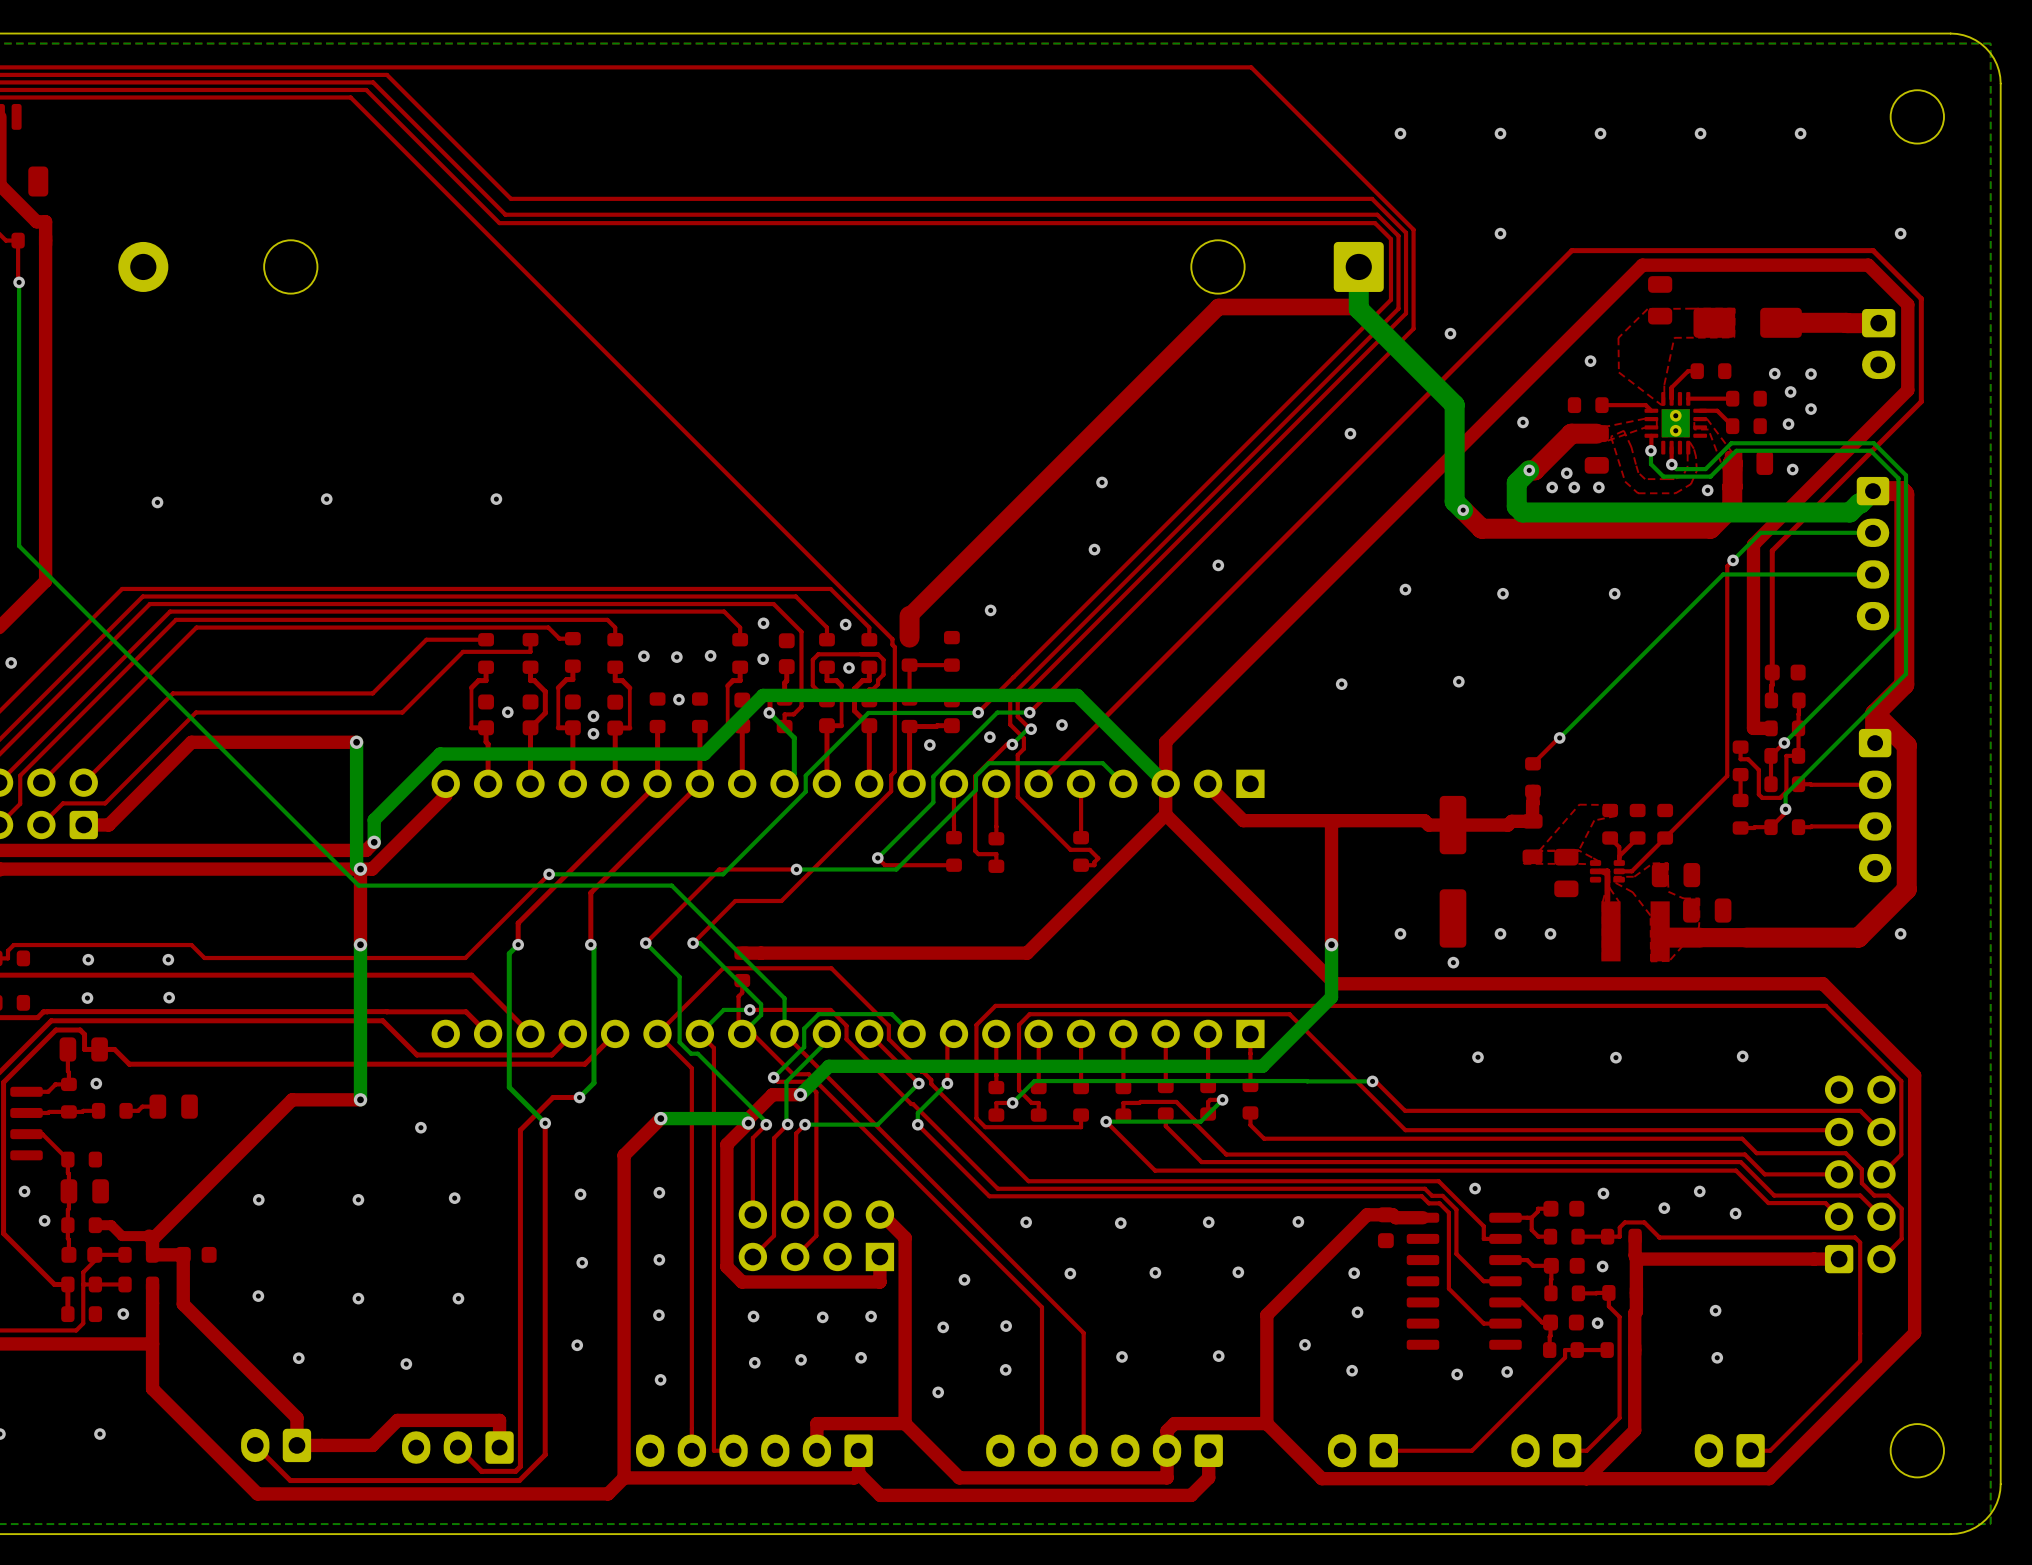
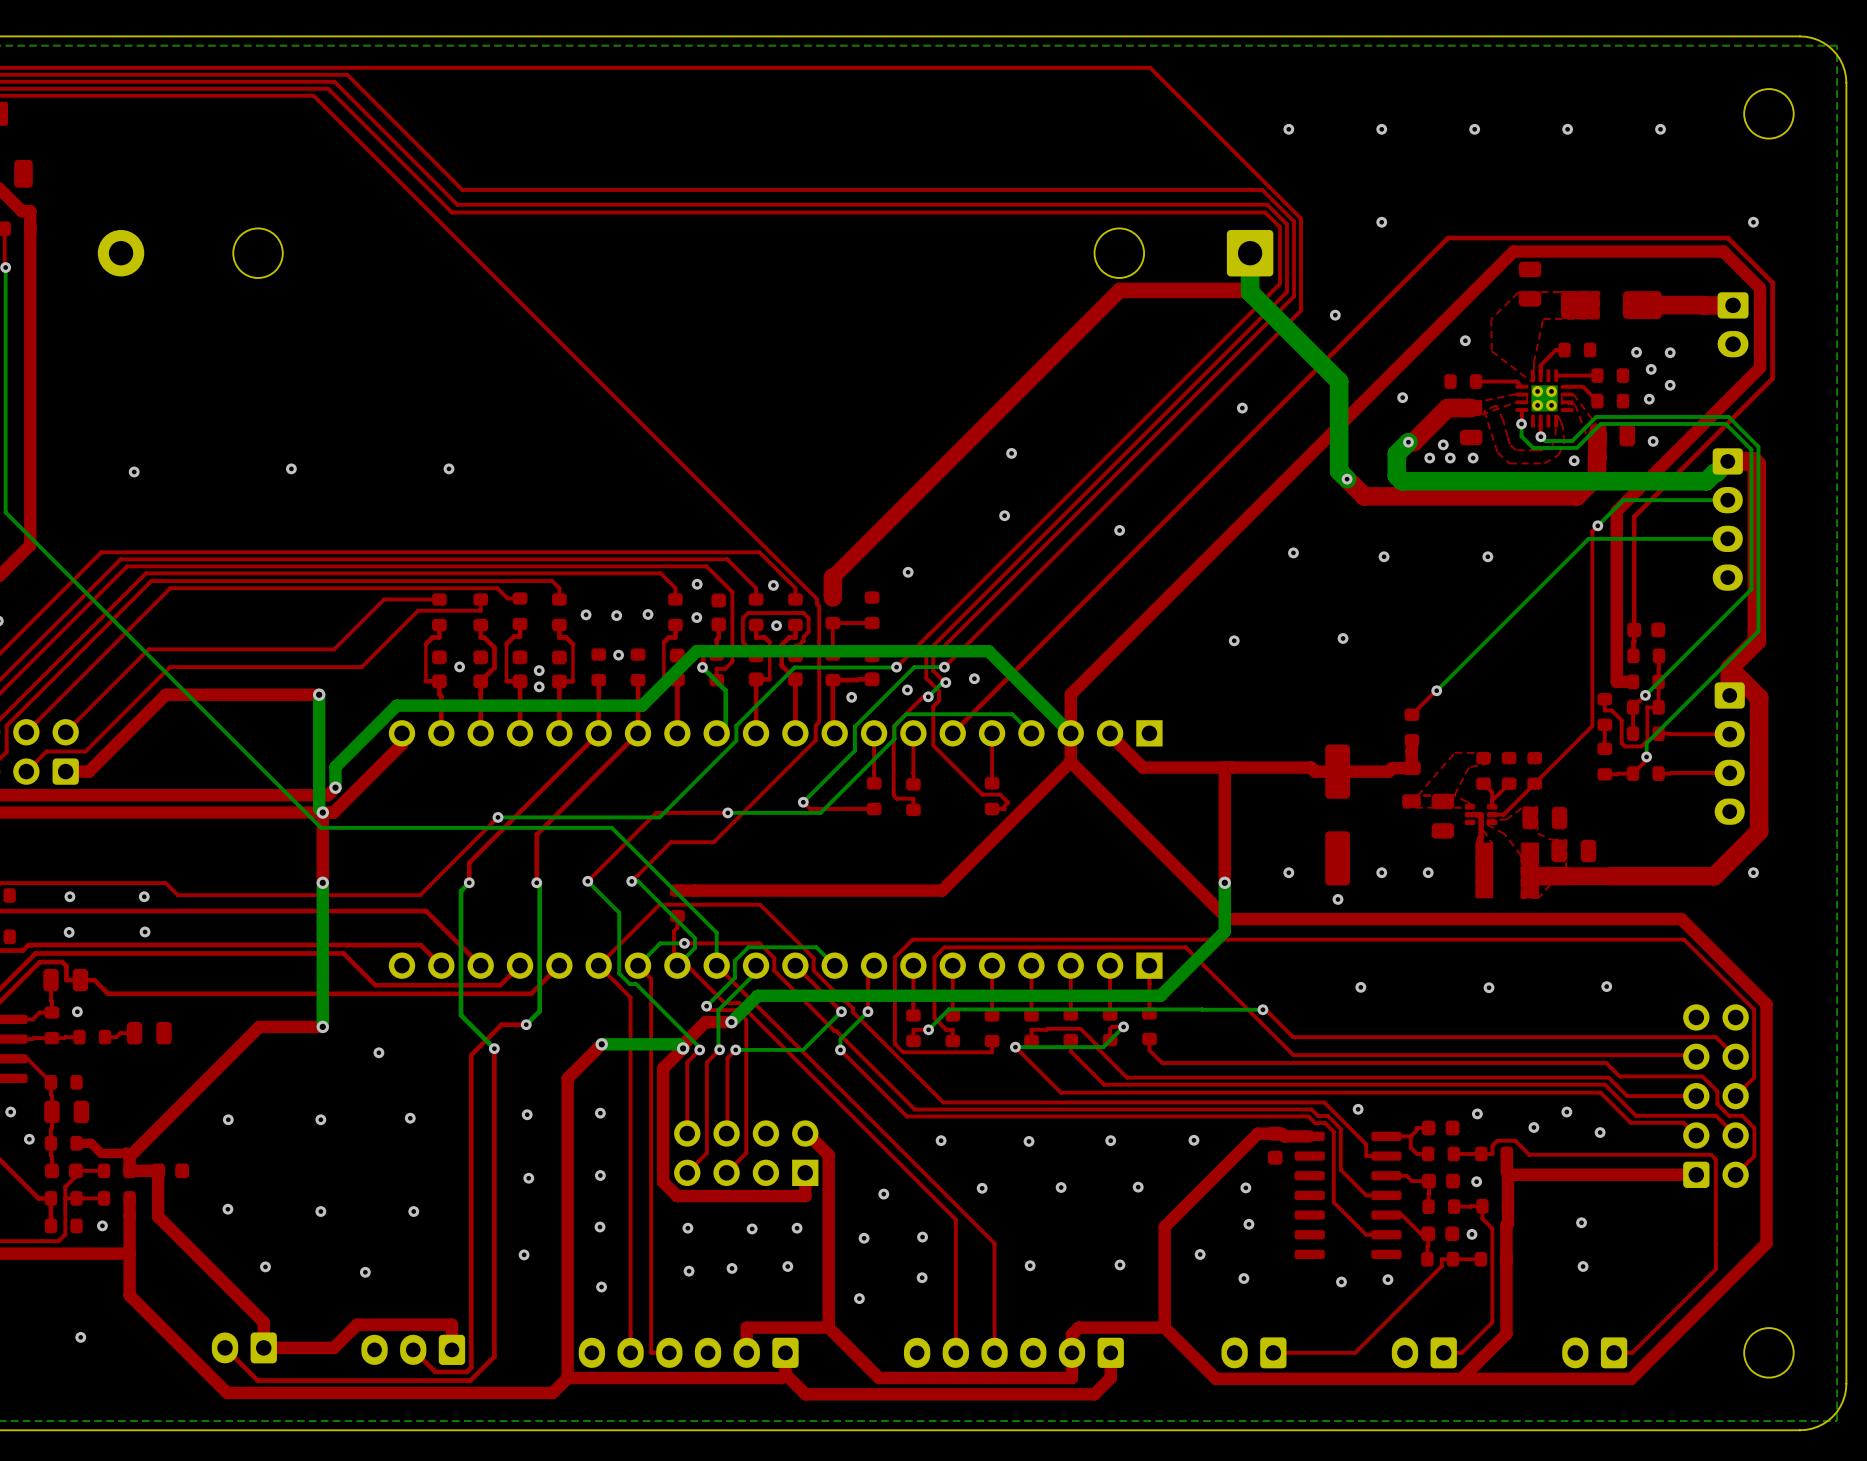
part footprint: [1644, 392, 1708, 455] -> [1515, 369, 1574, 428]

